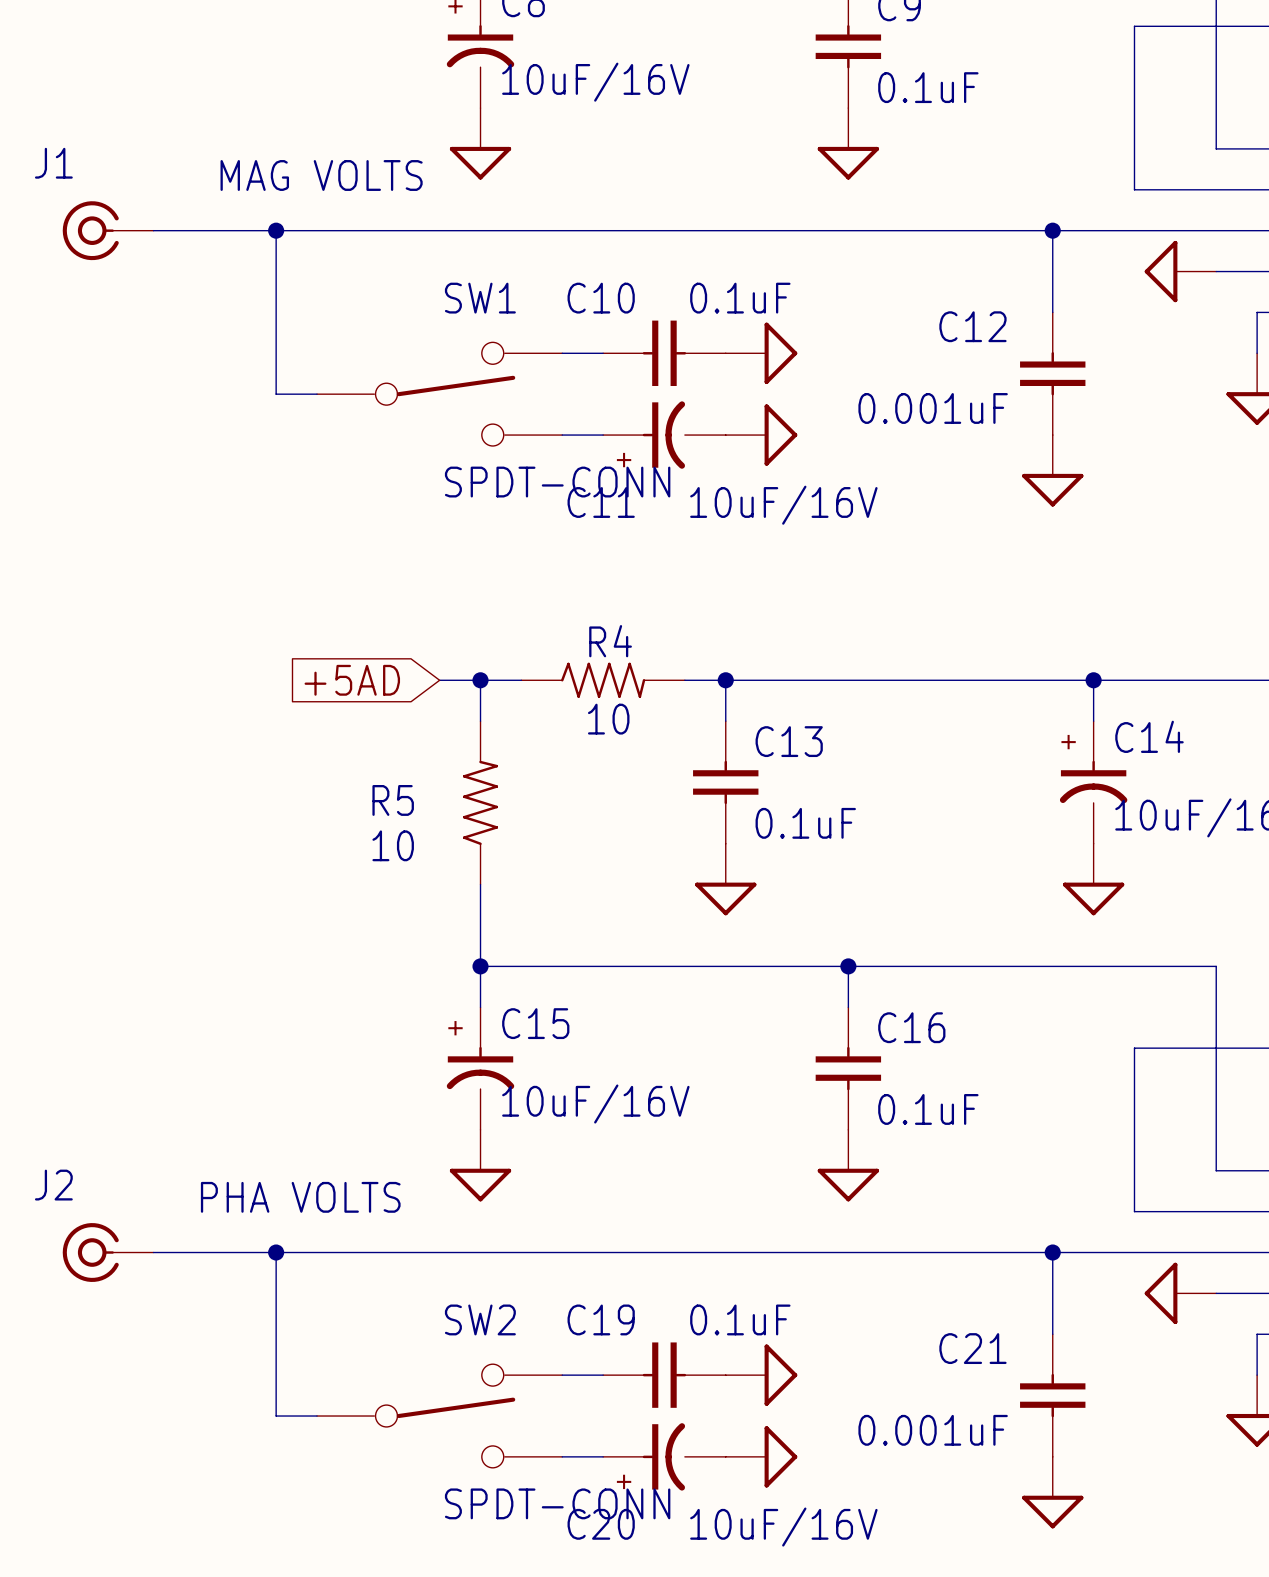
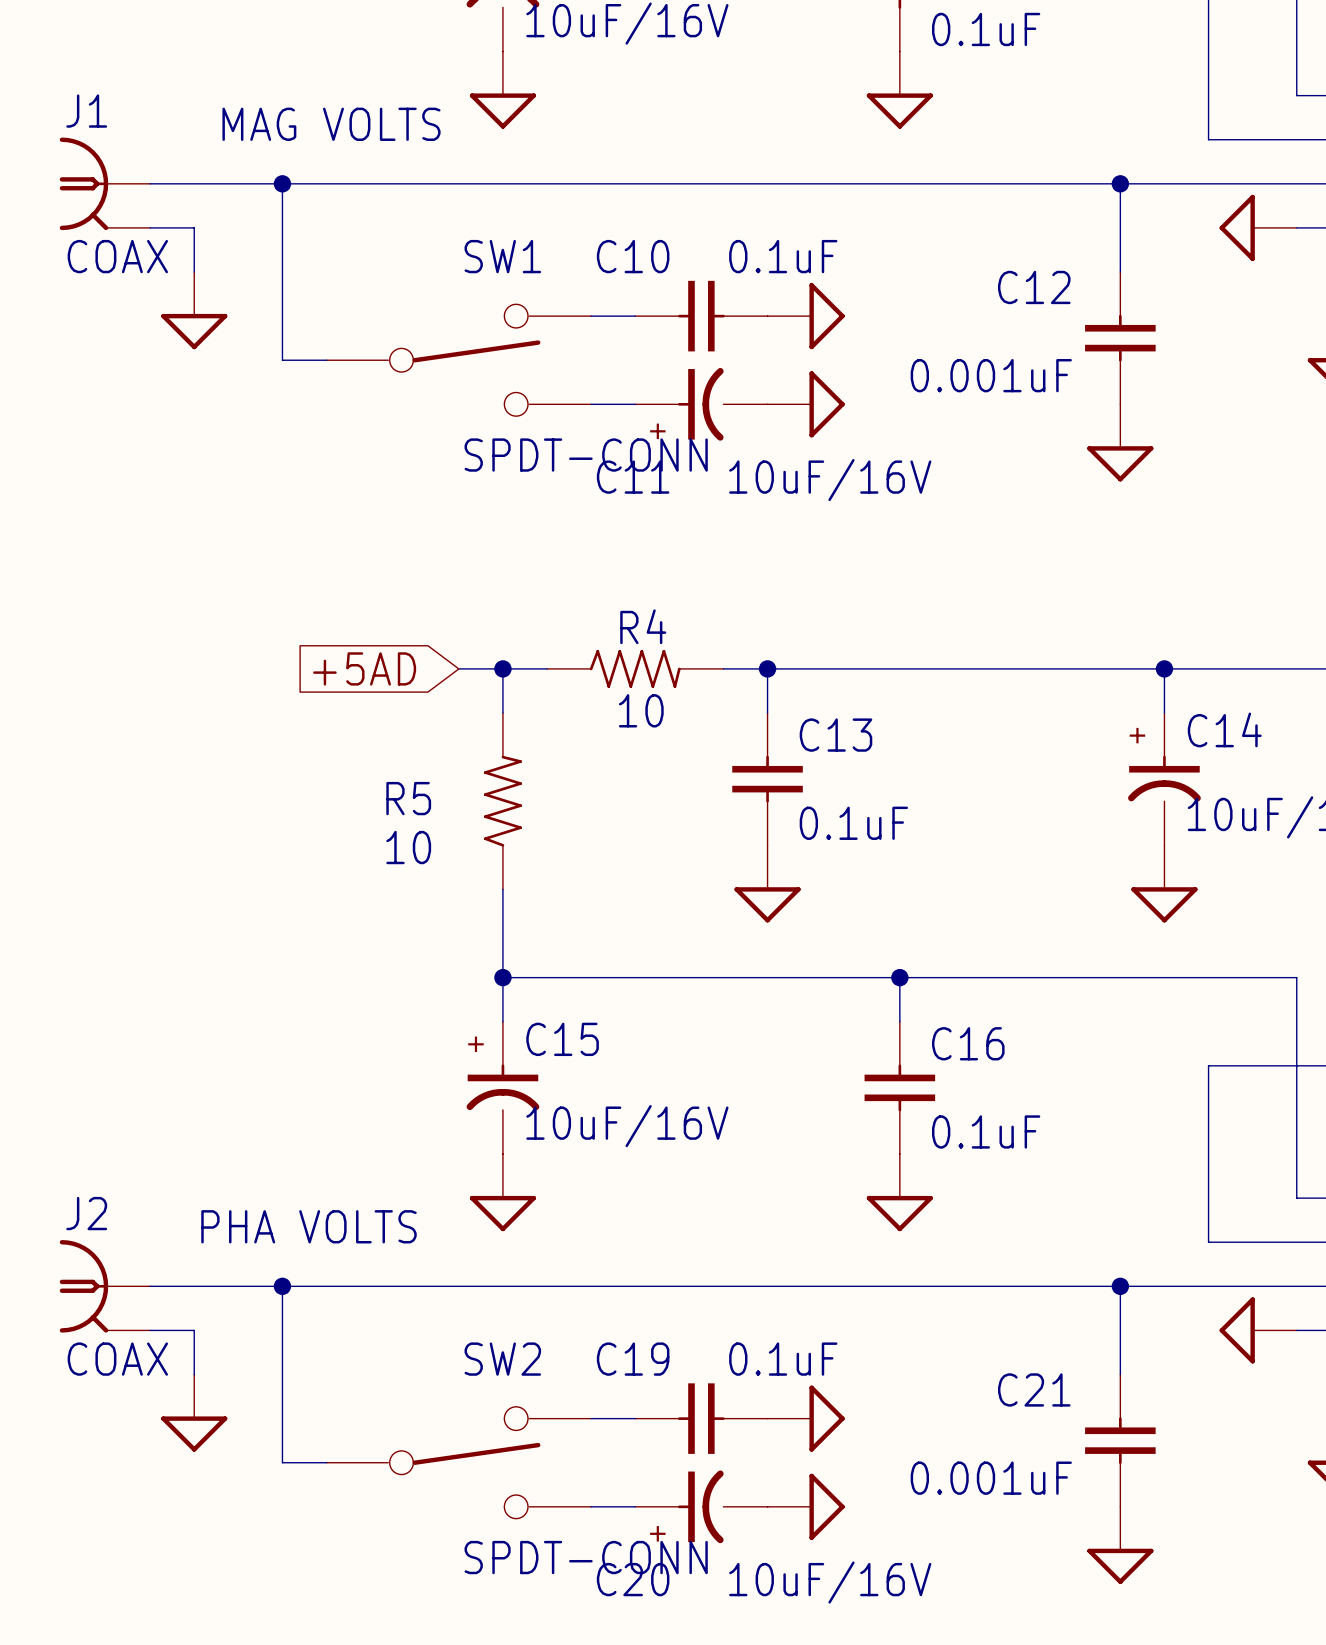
J1 name position: J1 (53, 163) -> J1 (86, 111)
J1 symbol: [62, 201, 154, 261] -> [59, 137, 151, 231]
wire: none -> (150, 227) (194, 227) (194, 272)
J1 value: none -> COAX (117, 256)
power symbol: none -> (194, 310)
J2 name position: J2 (53, 1185) -> J2 (86, 1213)
J2 symbol: [62, 1223, 154, 1282] -> [59, 1240, 151, 1333]
wire: none -> (150, 1330) (194, 1330) (194, 1374)
J2 value: none -> COAX (117, 1359)
power symbol: none -> (194, 1413)

